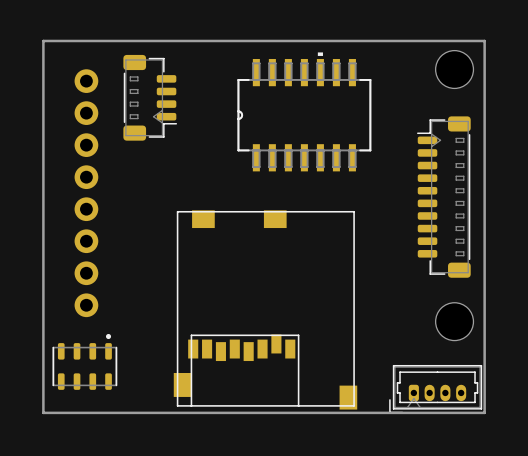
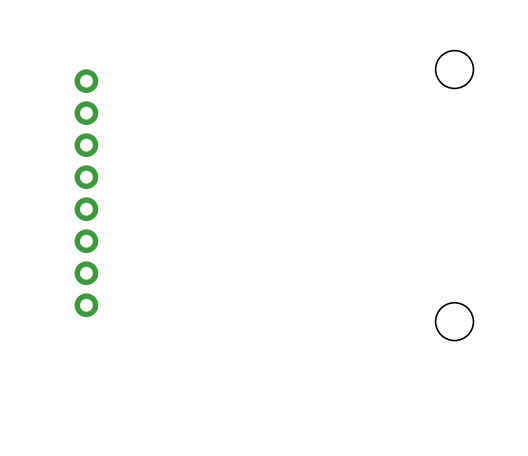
board edge: (43, 40) (484, 40) (484, 412) (43, 412) (43, 40) -> none
part: (150, 97) -> none
part: (304, 111) -> none
part: (443, 197) -> none
part: (265, 309) -> none
part: (84, 361) -> none
part: (435, 389) -> none

